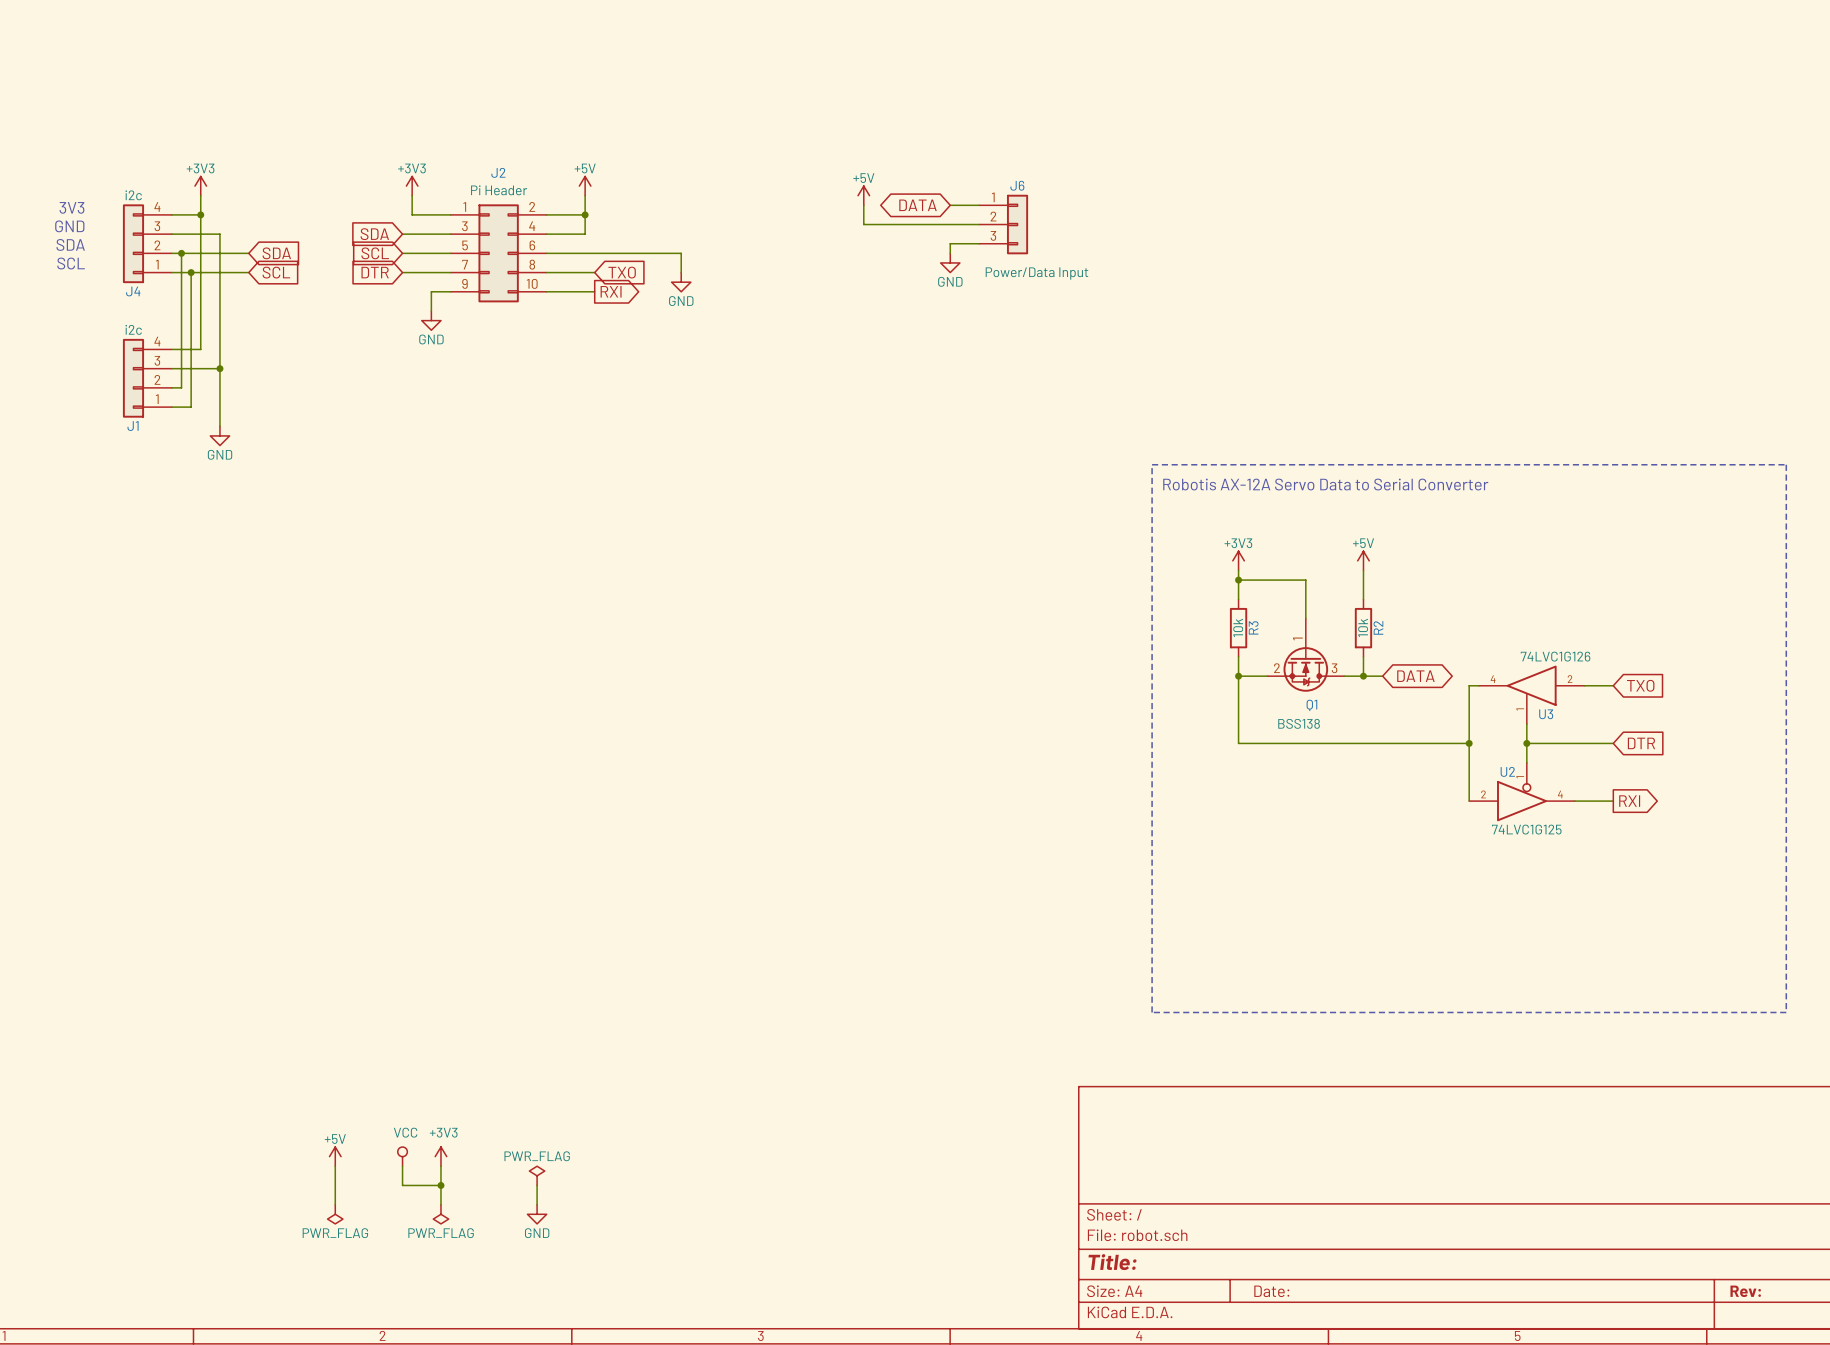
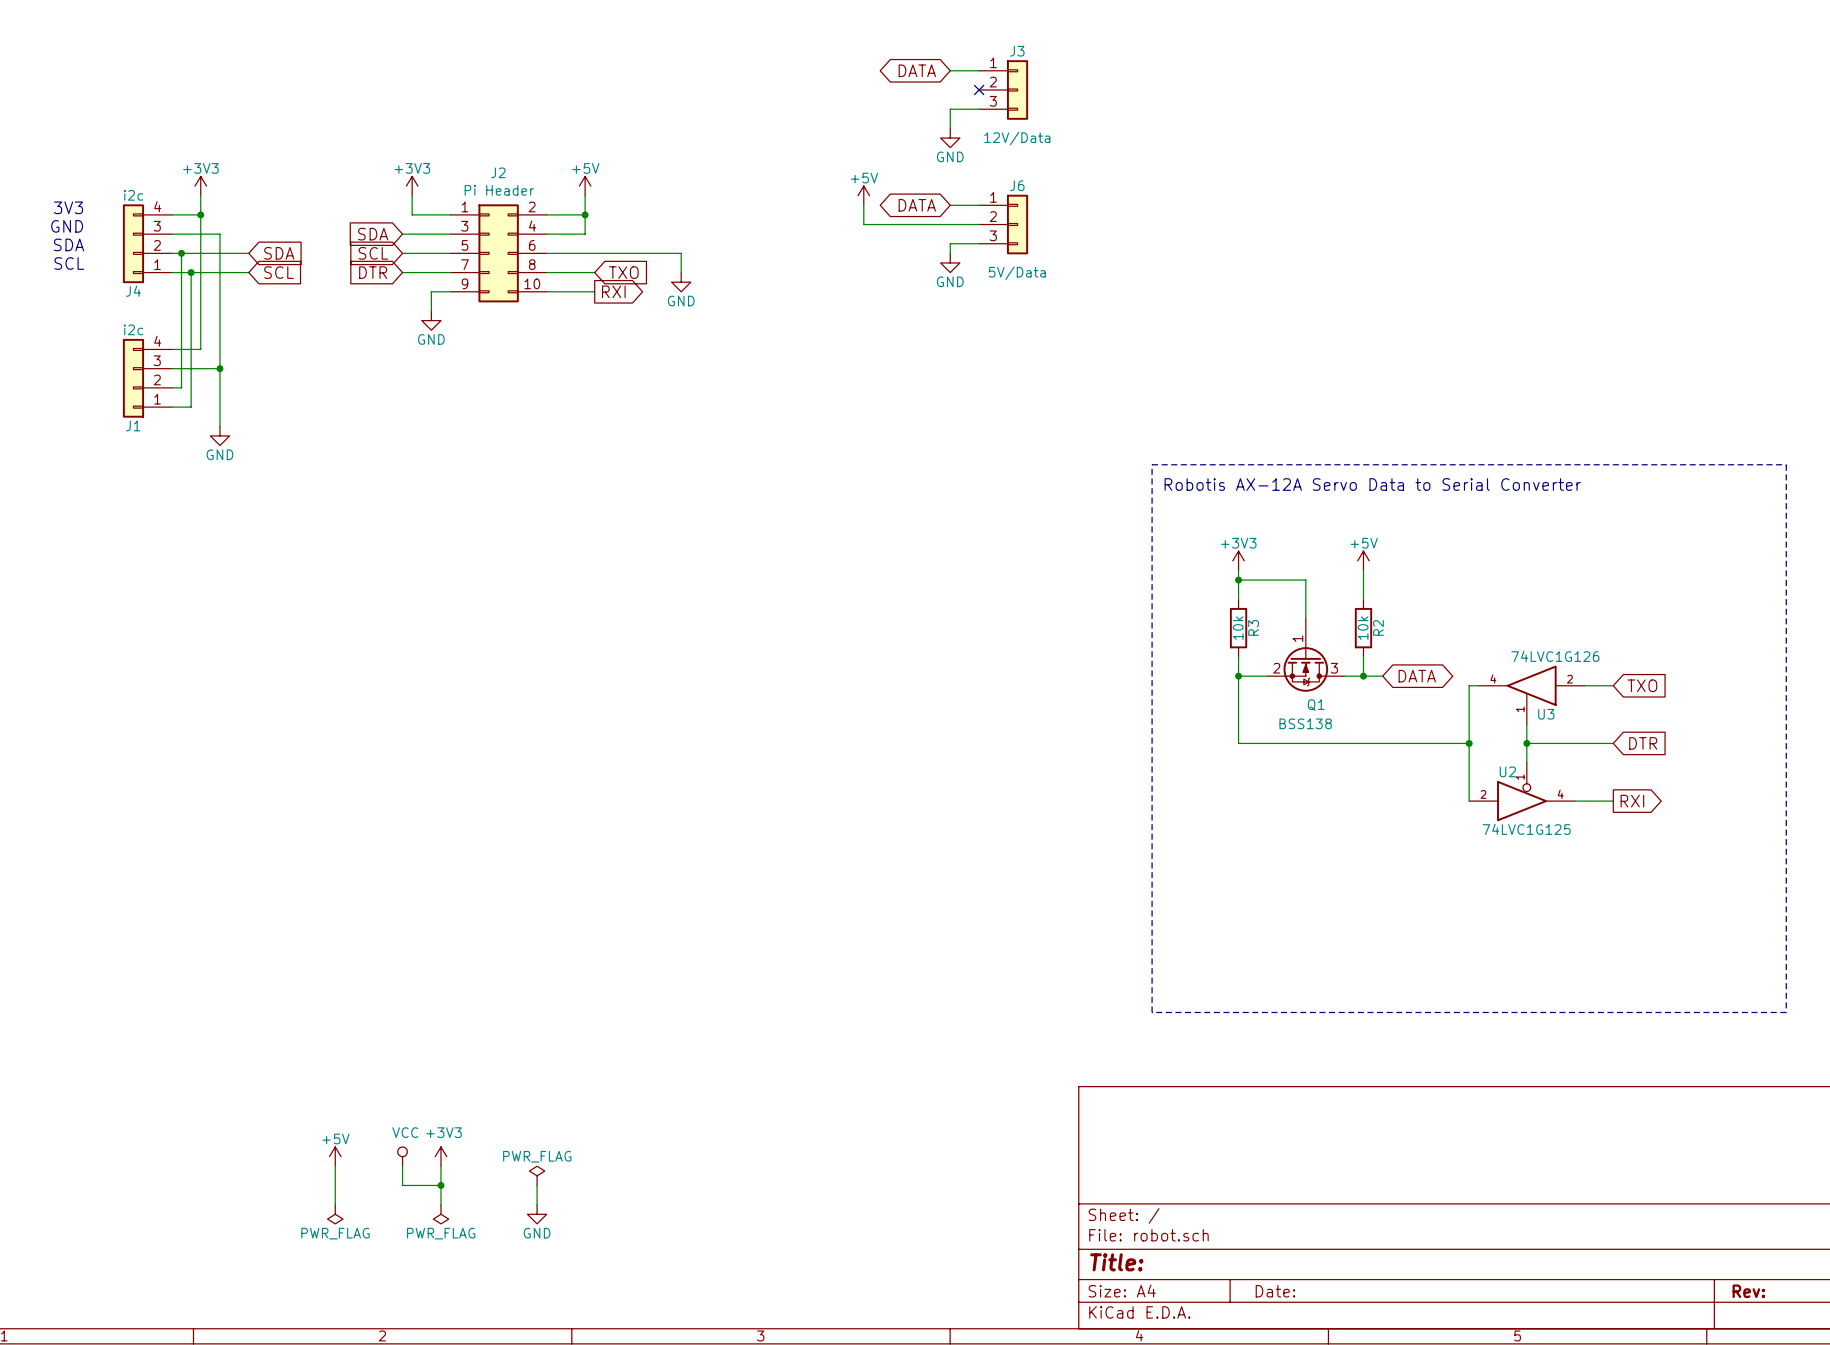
global label: none -> DATA (917, 70)
wire: none -> (950, 70) (979, 70)
no-connect mark: none -> (979, 90)
J3: none -> 12V/Data (1003, 90)
wire: none -> (979, 109) (950, 109) (950, 128)
power symbol: none -> GND (950, 138)
J6 value: Power/Data Input (1036, 273) -> 5V/Data (1017, 273)

